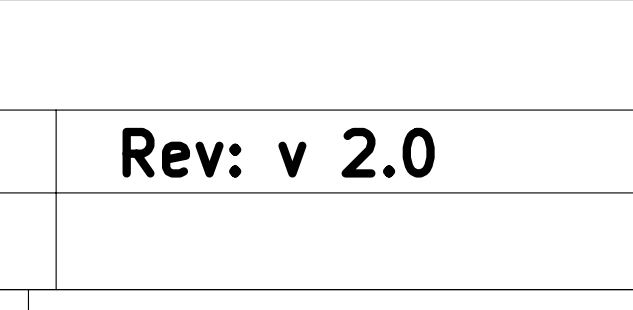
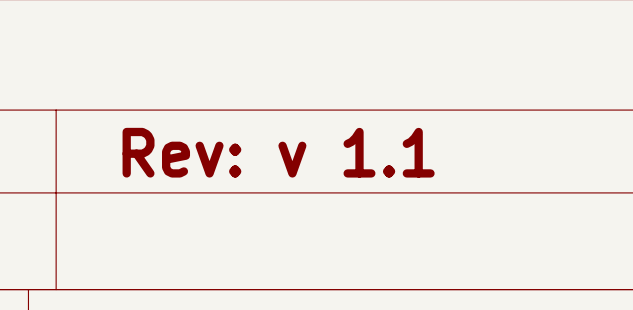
title block: Rev: v 2.0 (278, 152) -> Rev: v 1.1 (278, 152)

